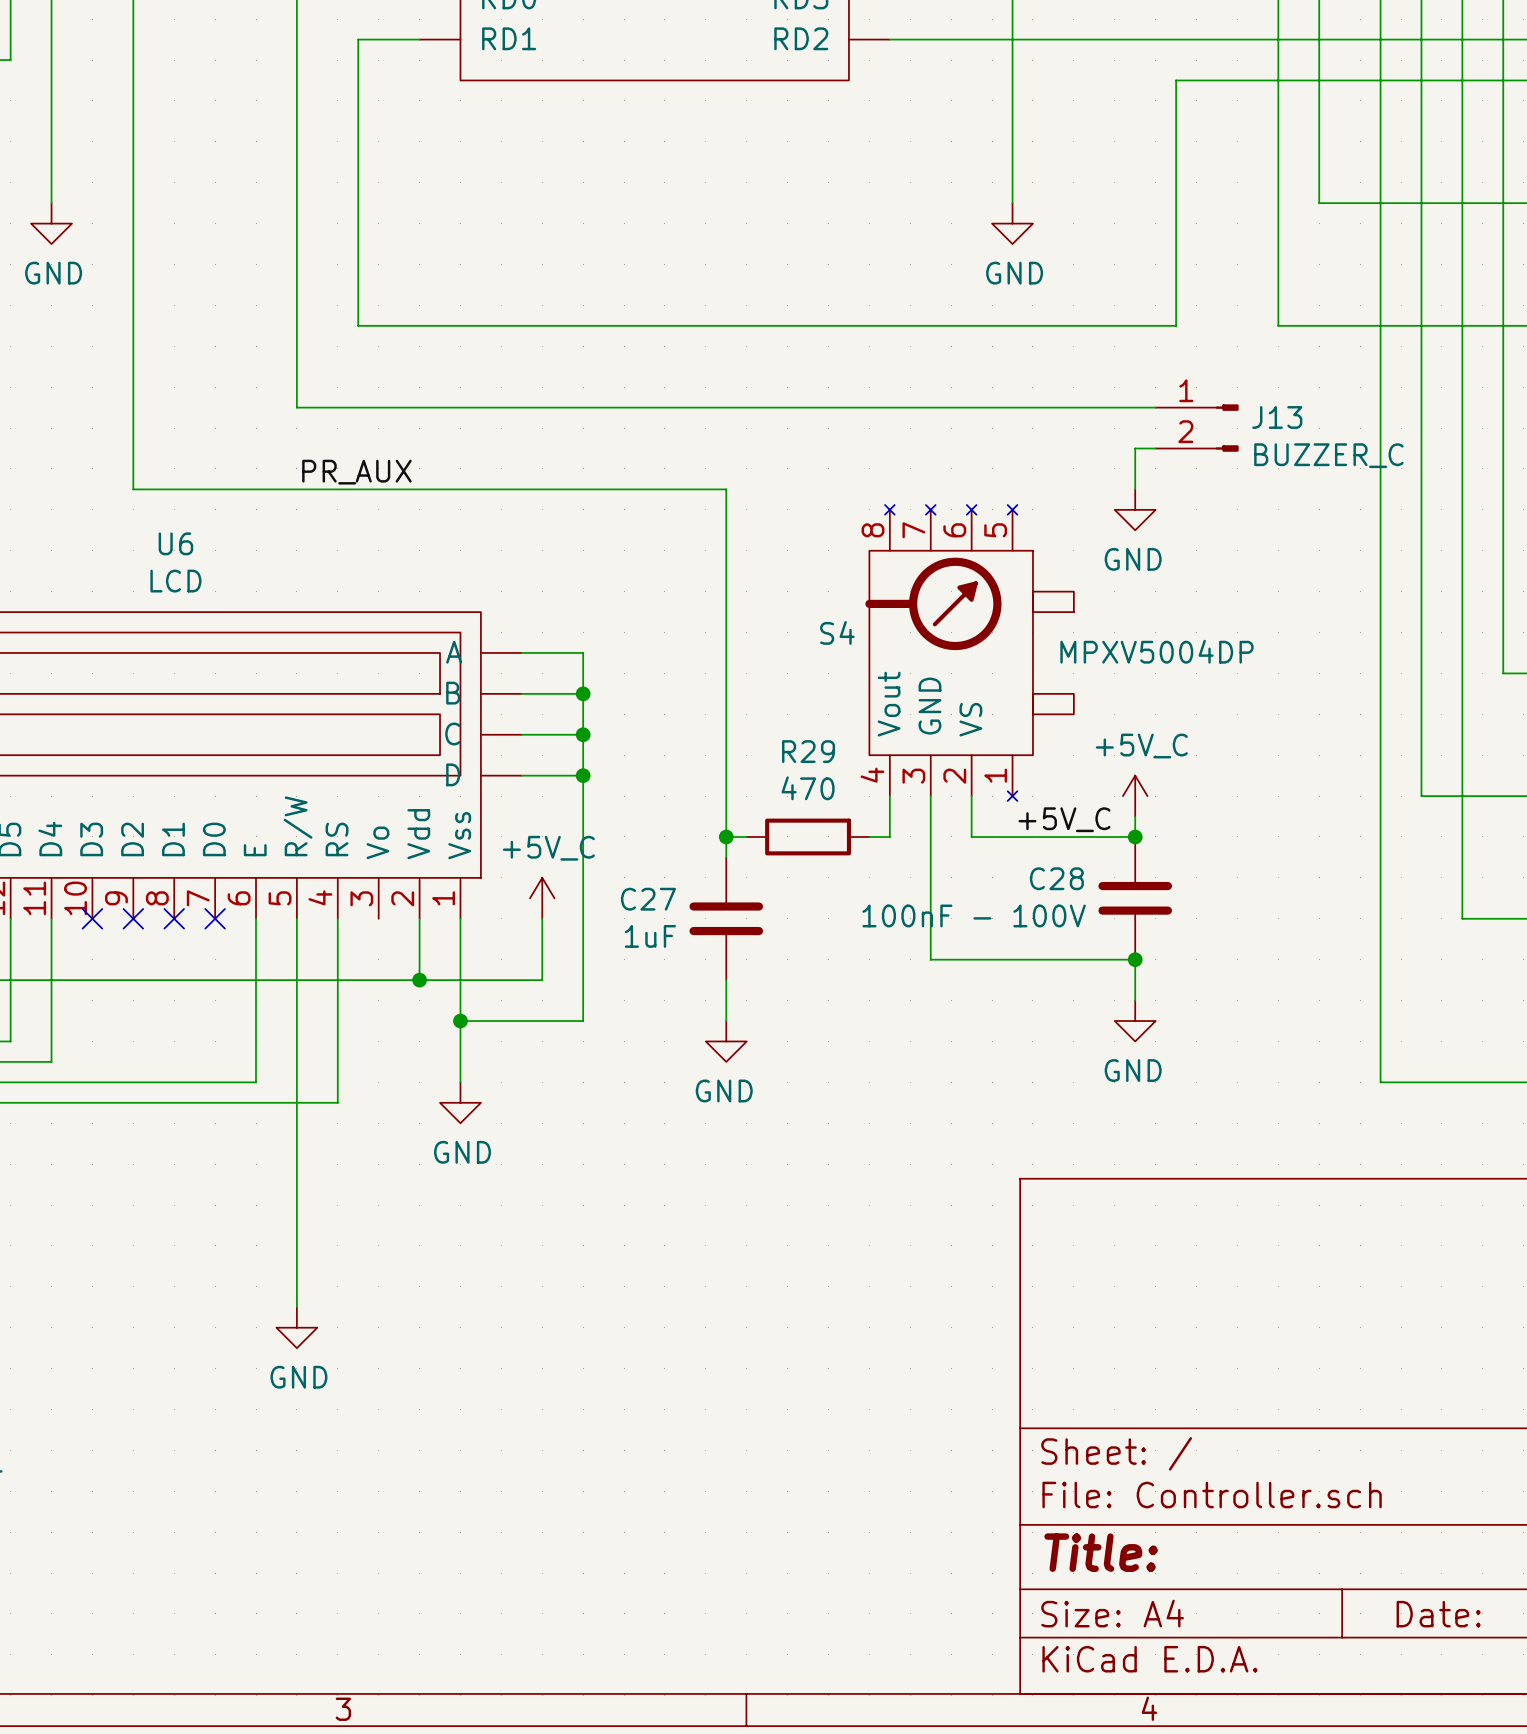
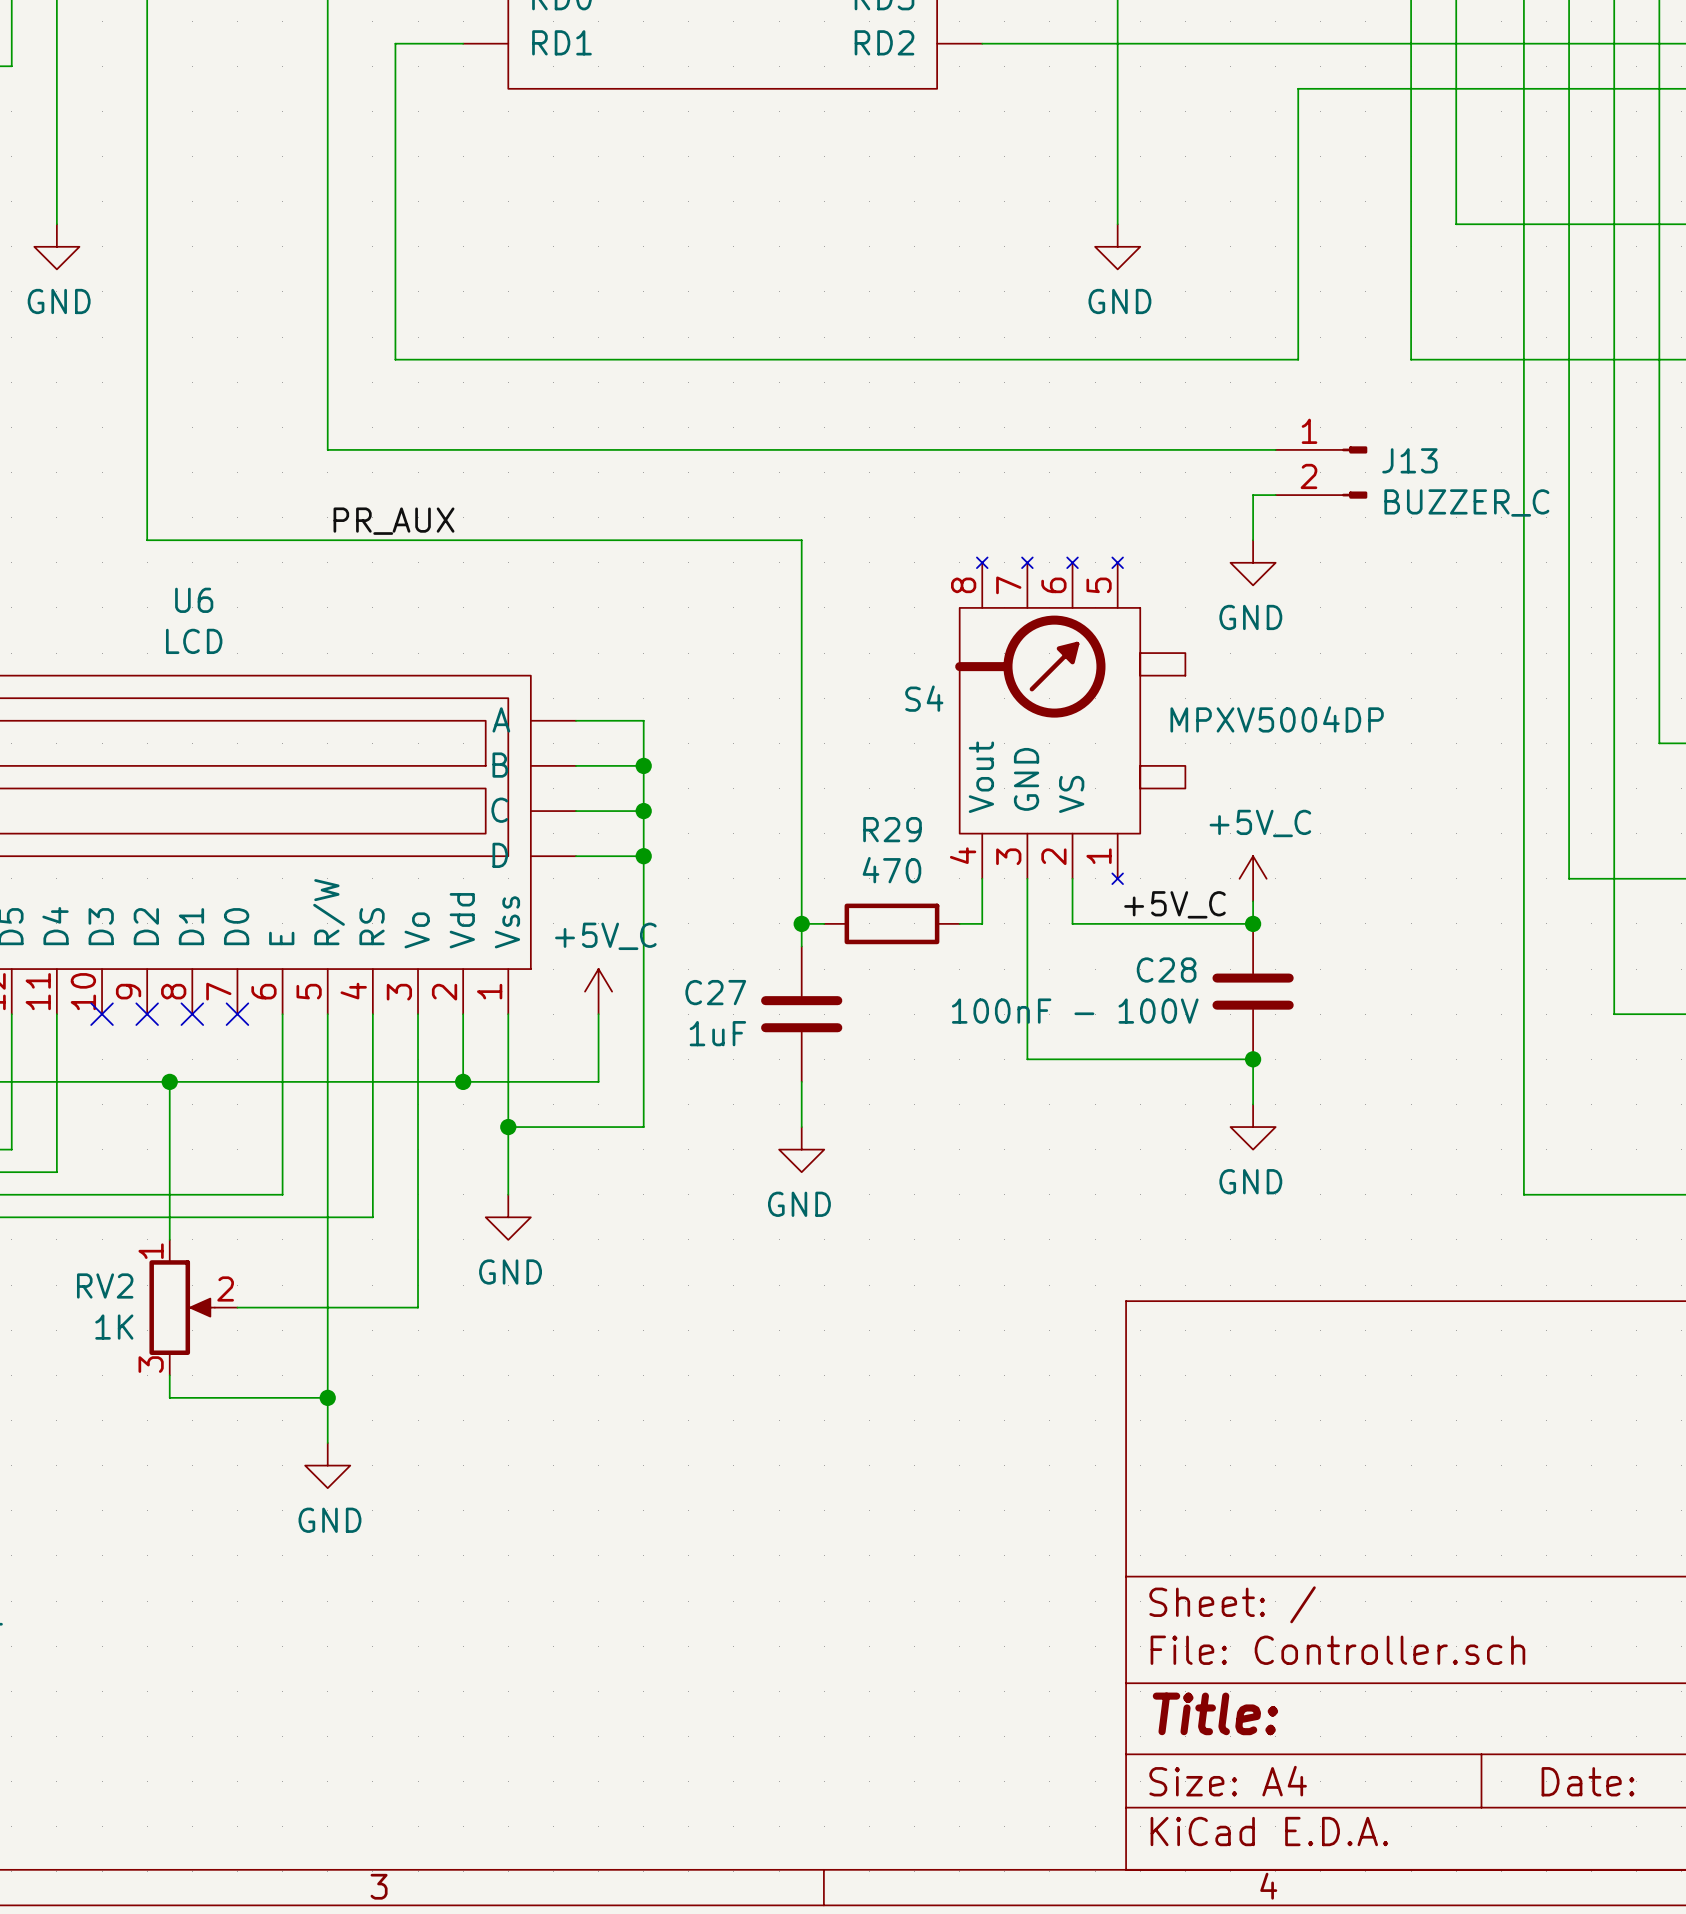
wire: none -> (418, 1014) (418, 1307) (237, 1307)
wire: none -> (169, 1081) (169, 1239)
junction: none -> (169, 1081)
RV2: none -> 1K (193, 1307)
wire: none -> (169, 1375) (169, 1397) (327, 1397)
junction: none -> (327, 1397)

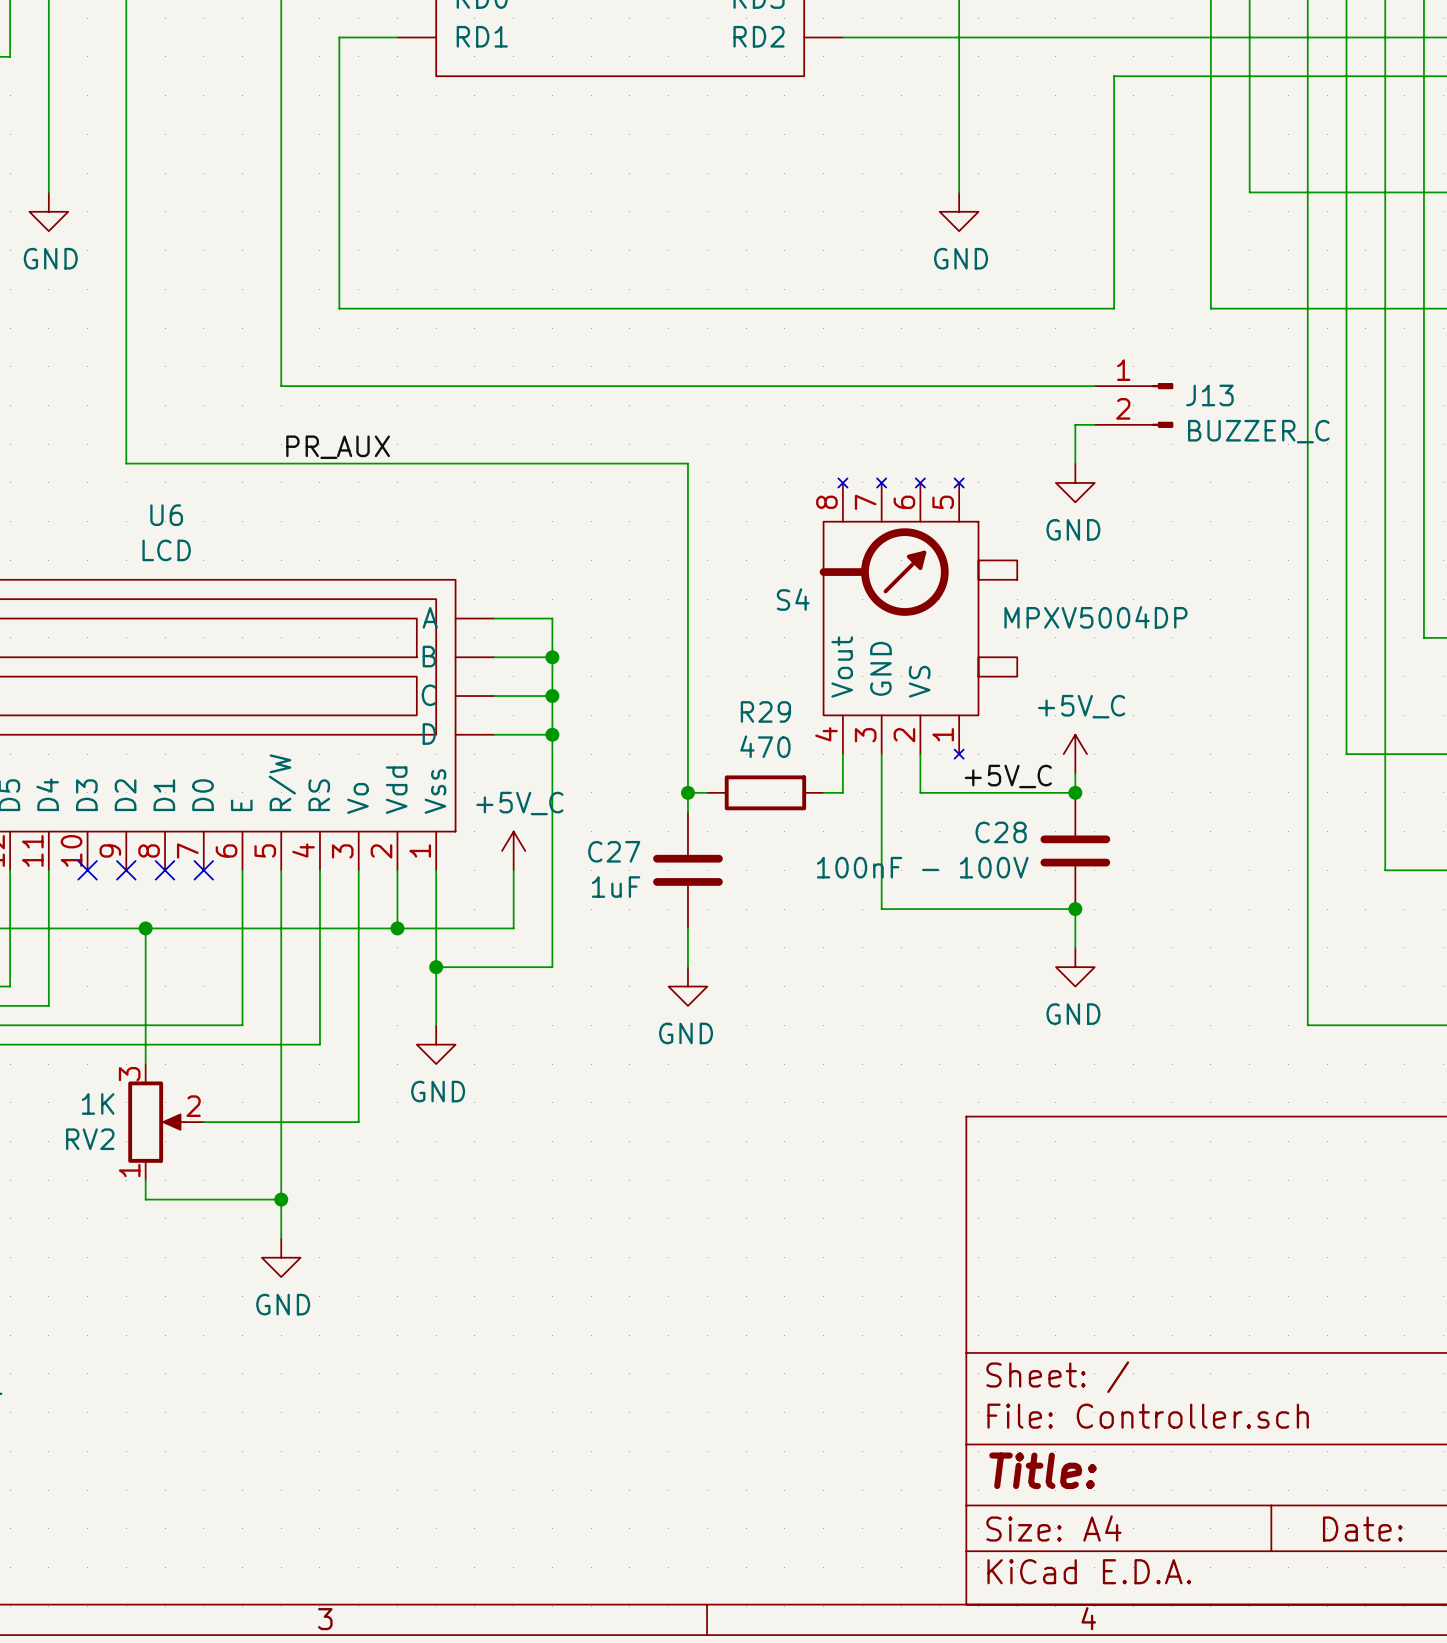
RV2 flip: as is (182, 1307) -> up-down (156, 1122)

